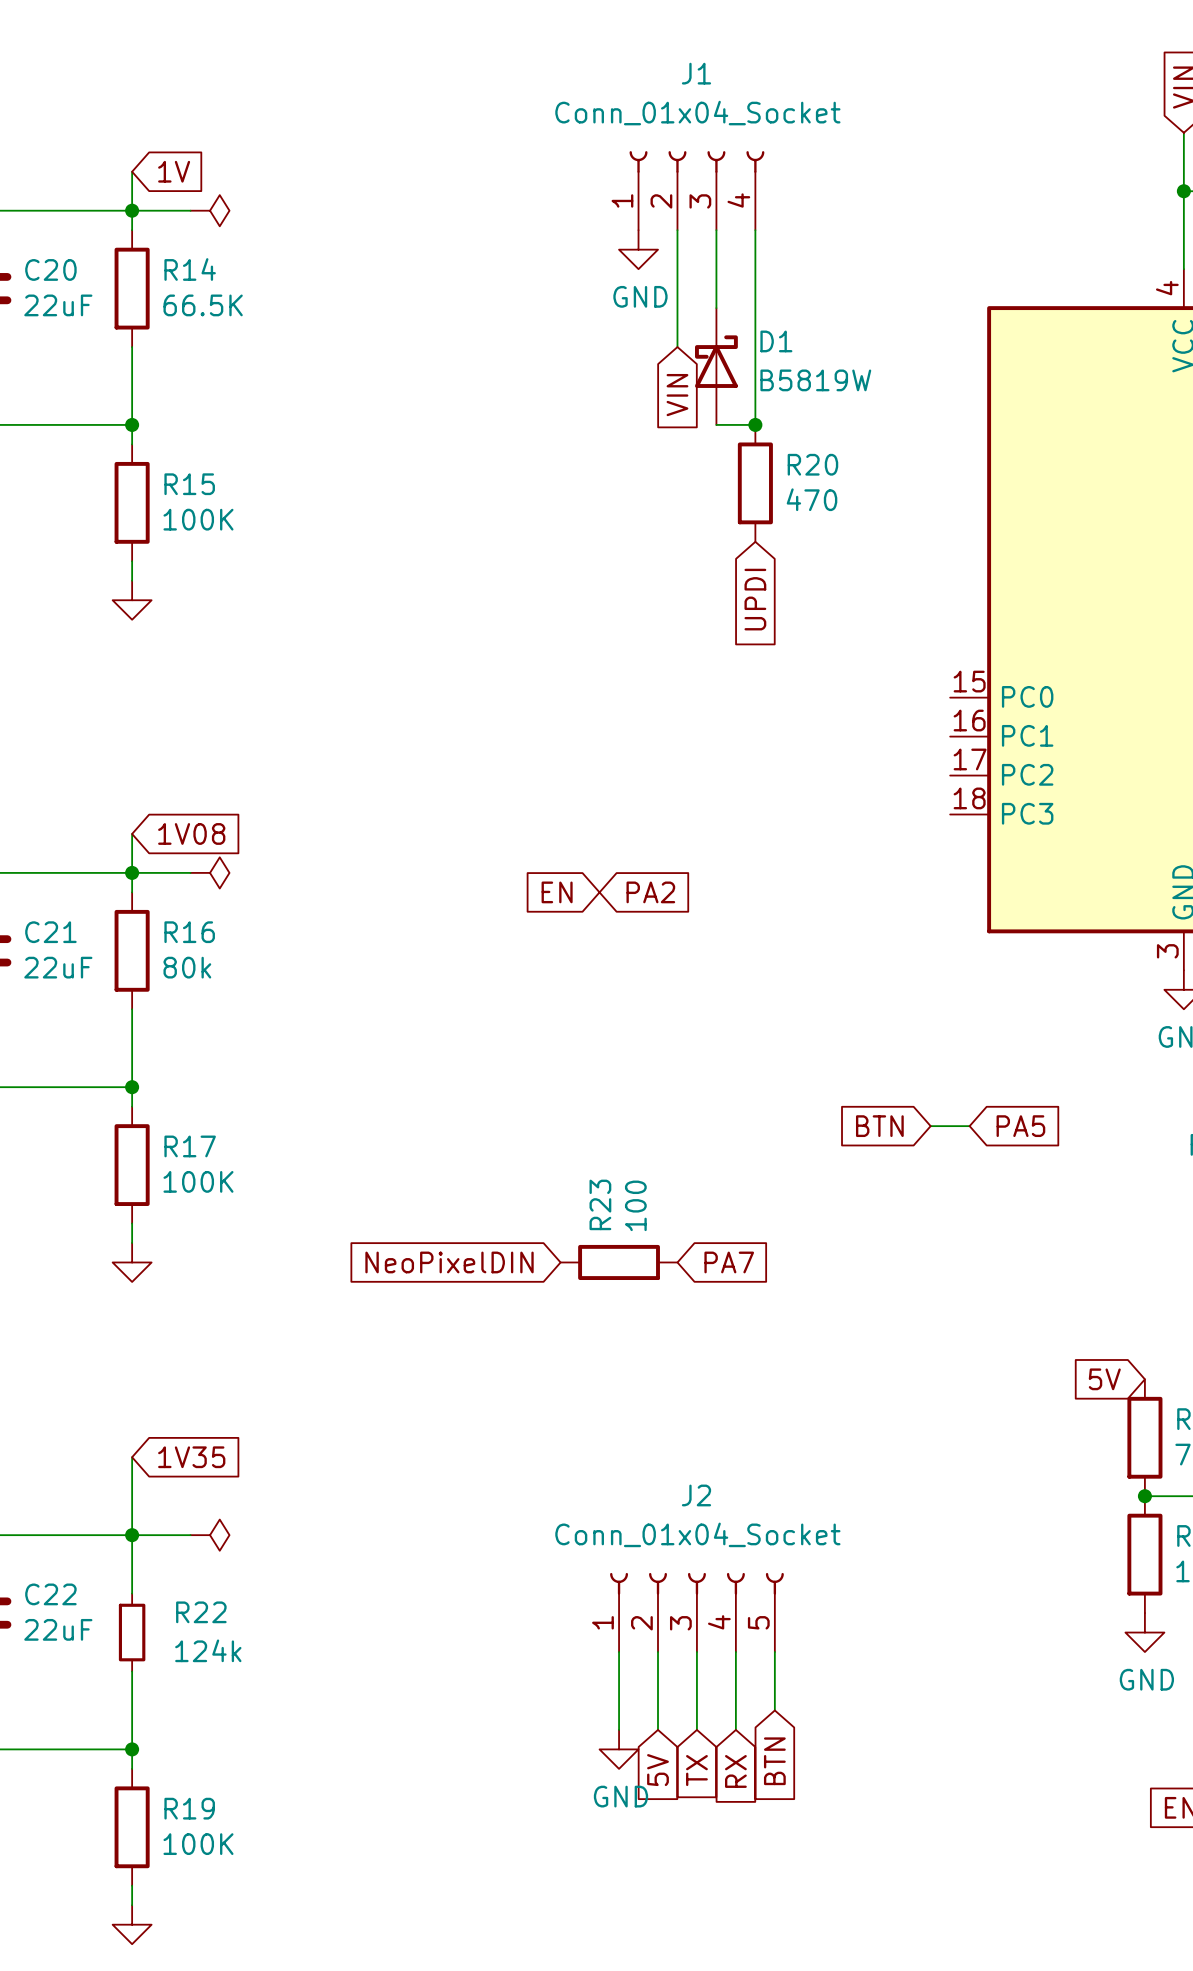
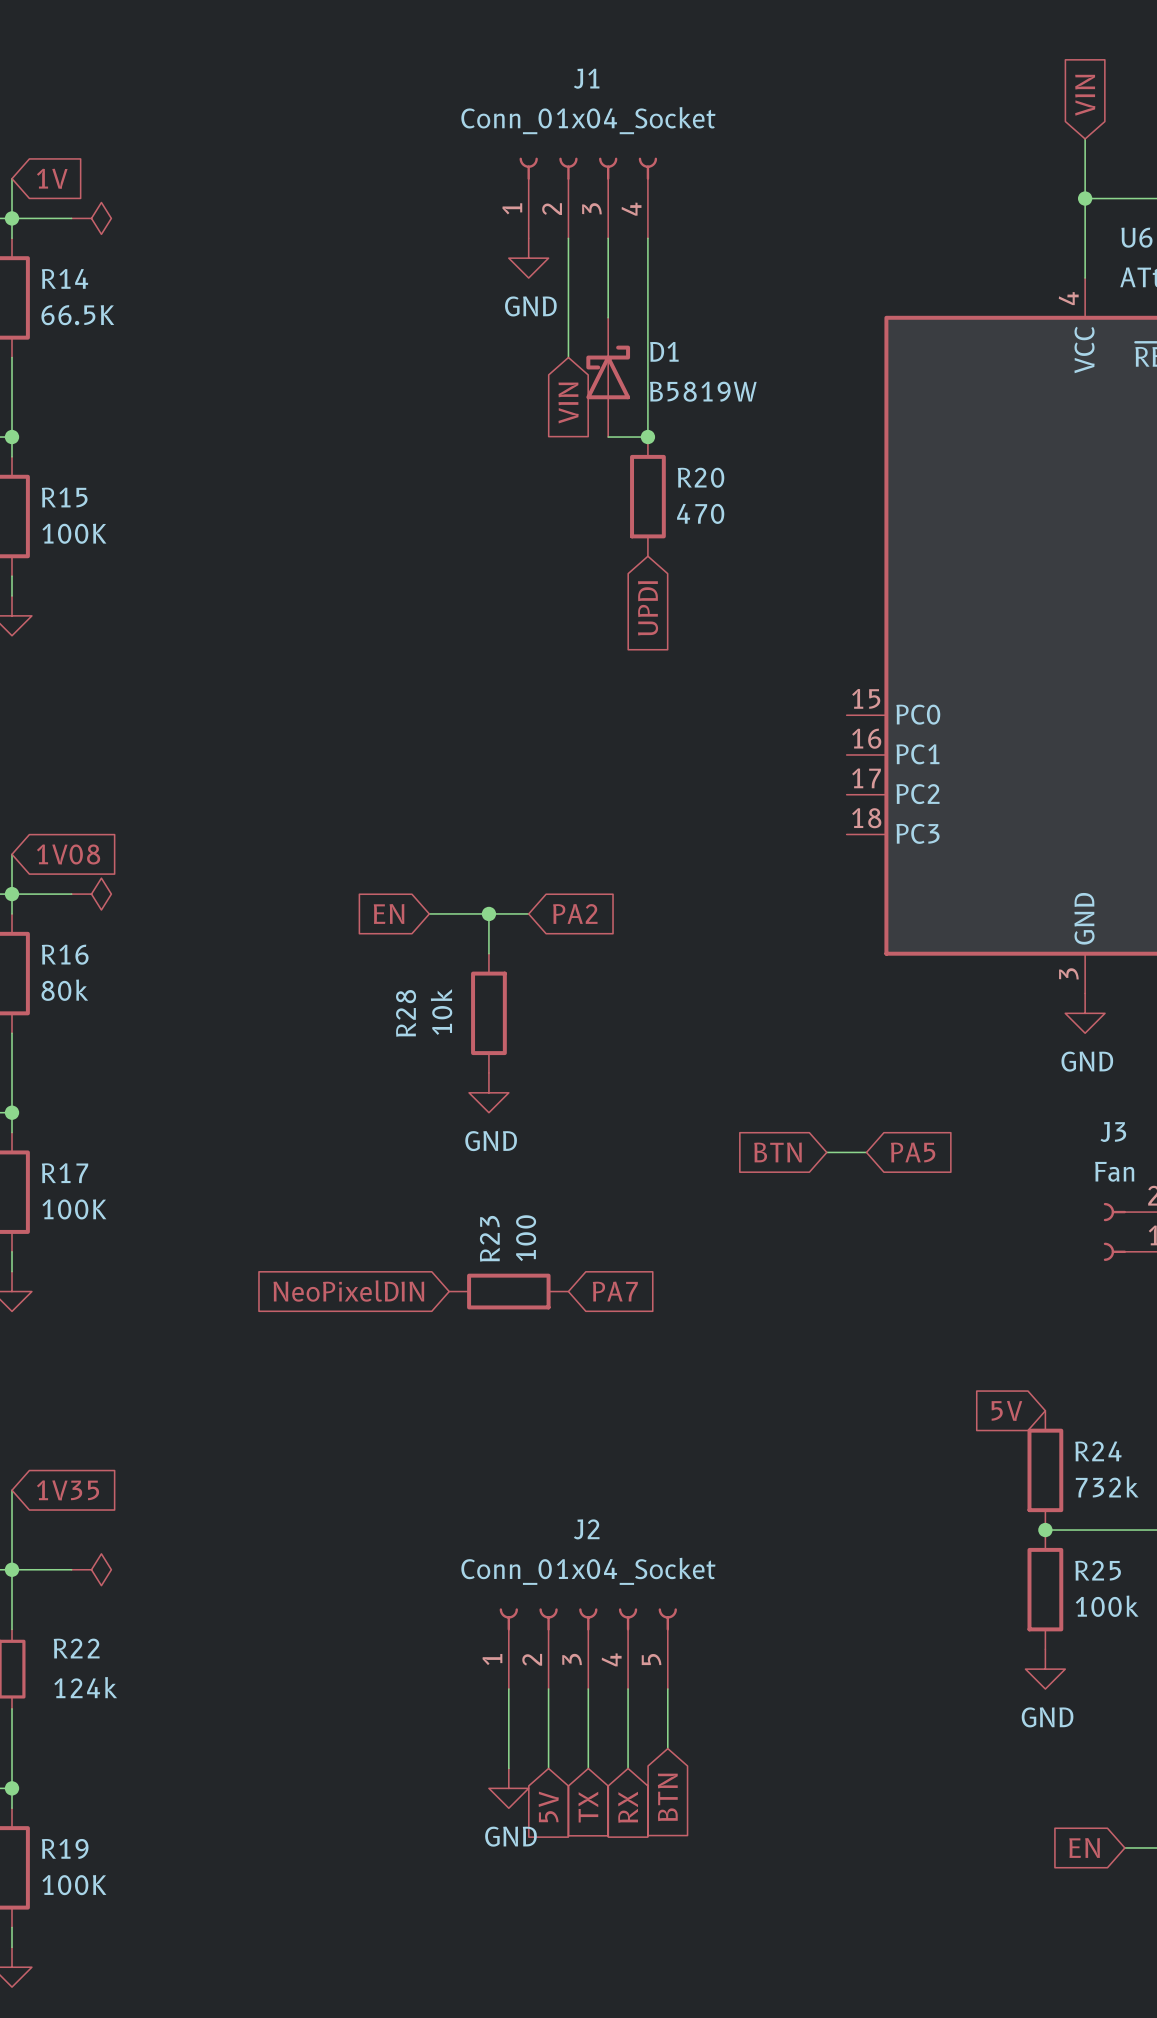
wire: none -> (429, 913) (528, 913)
global label position: EN (557, 892) -> EN (389, 913)
wire: none -> (488, 913) (488, 953)
junction: none -> (488, 913)
global label position: PA2 (650, 892) -> PA2 (575, 913)
R28: none -> 10k (488, 1013)
power symbol: none -> GND (488, 1092)

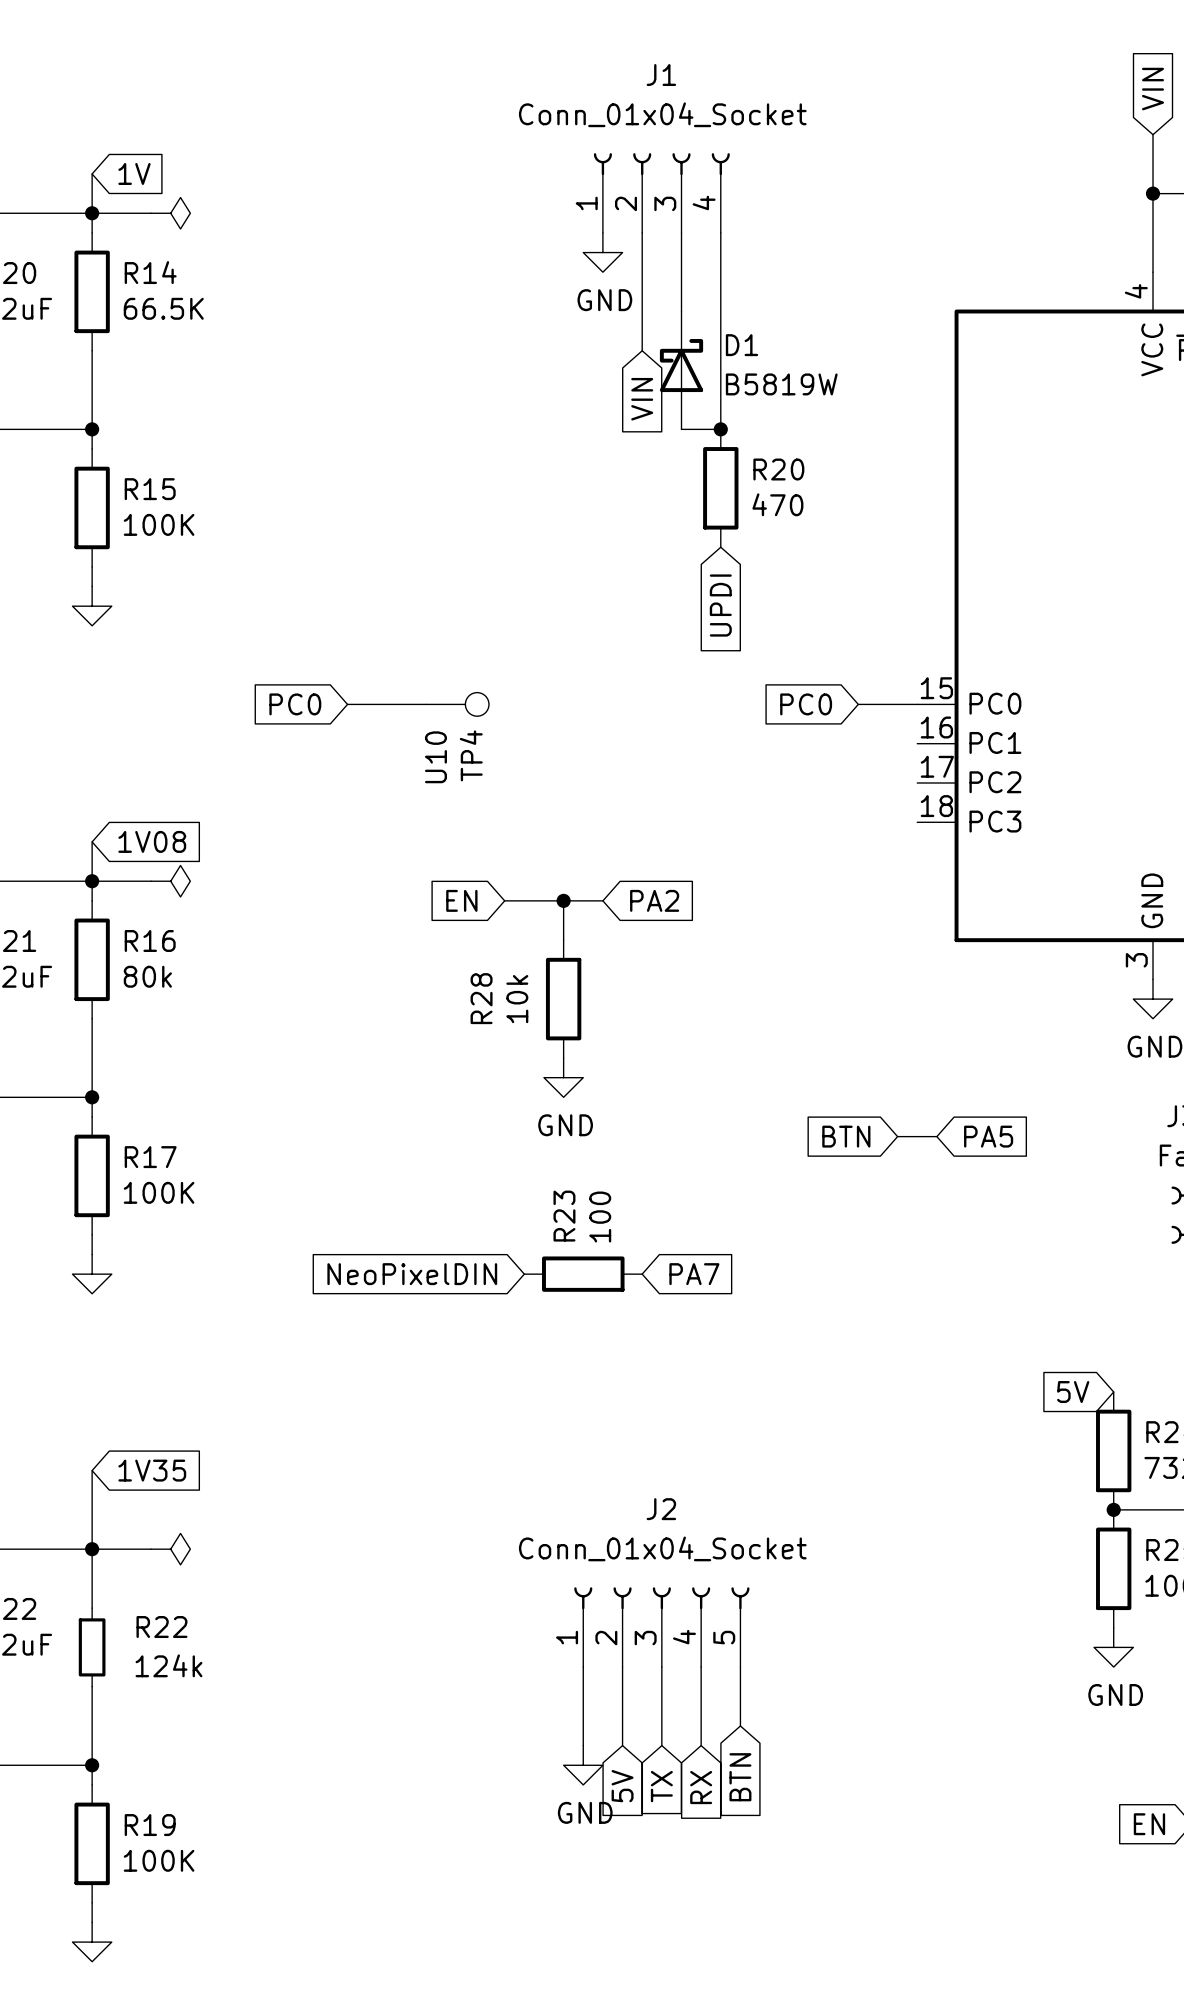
global label: none -> PC0 (295, 704)
wire: none -> (347, 704) (426, 704)
TP4: none -> U10 (457, 704)
global label: none -> PC0 (806, 704)
wire: none -> (858, 704) (917, 704)

